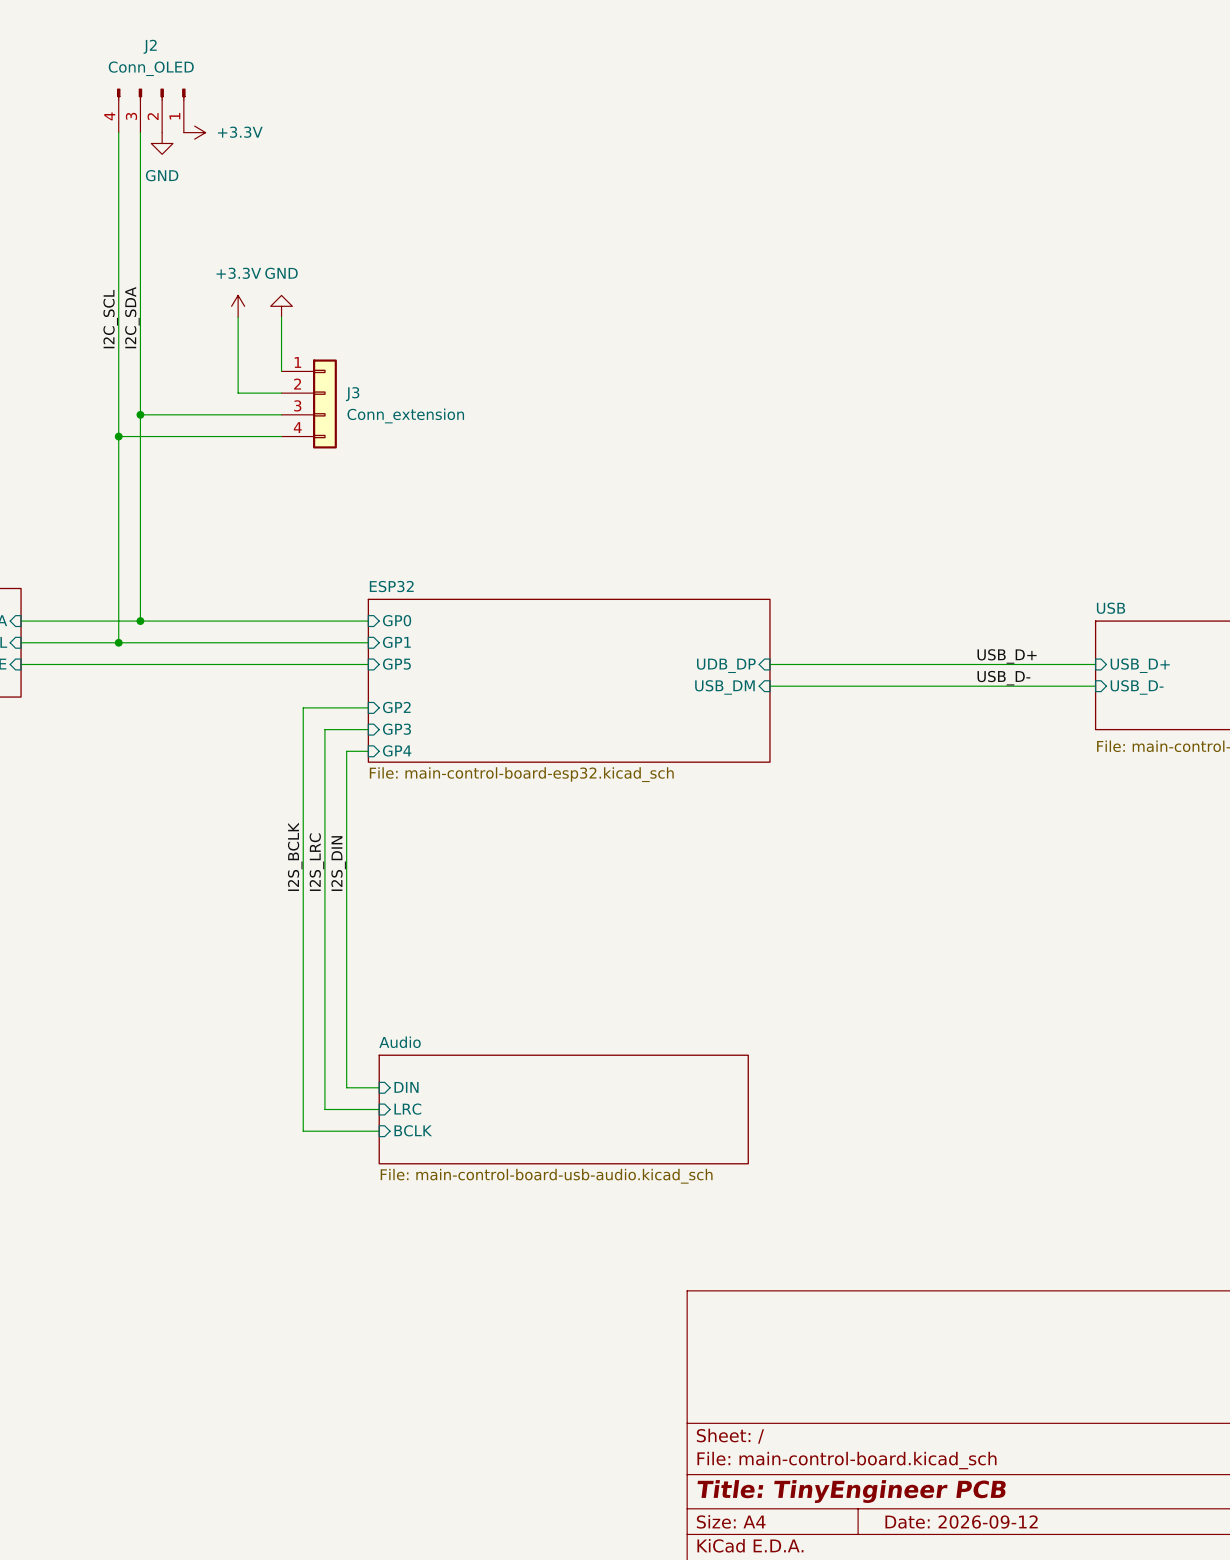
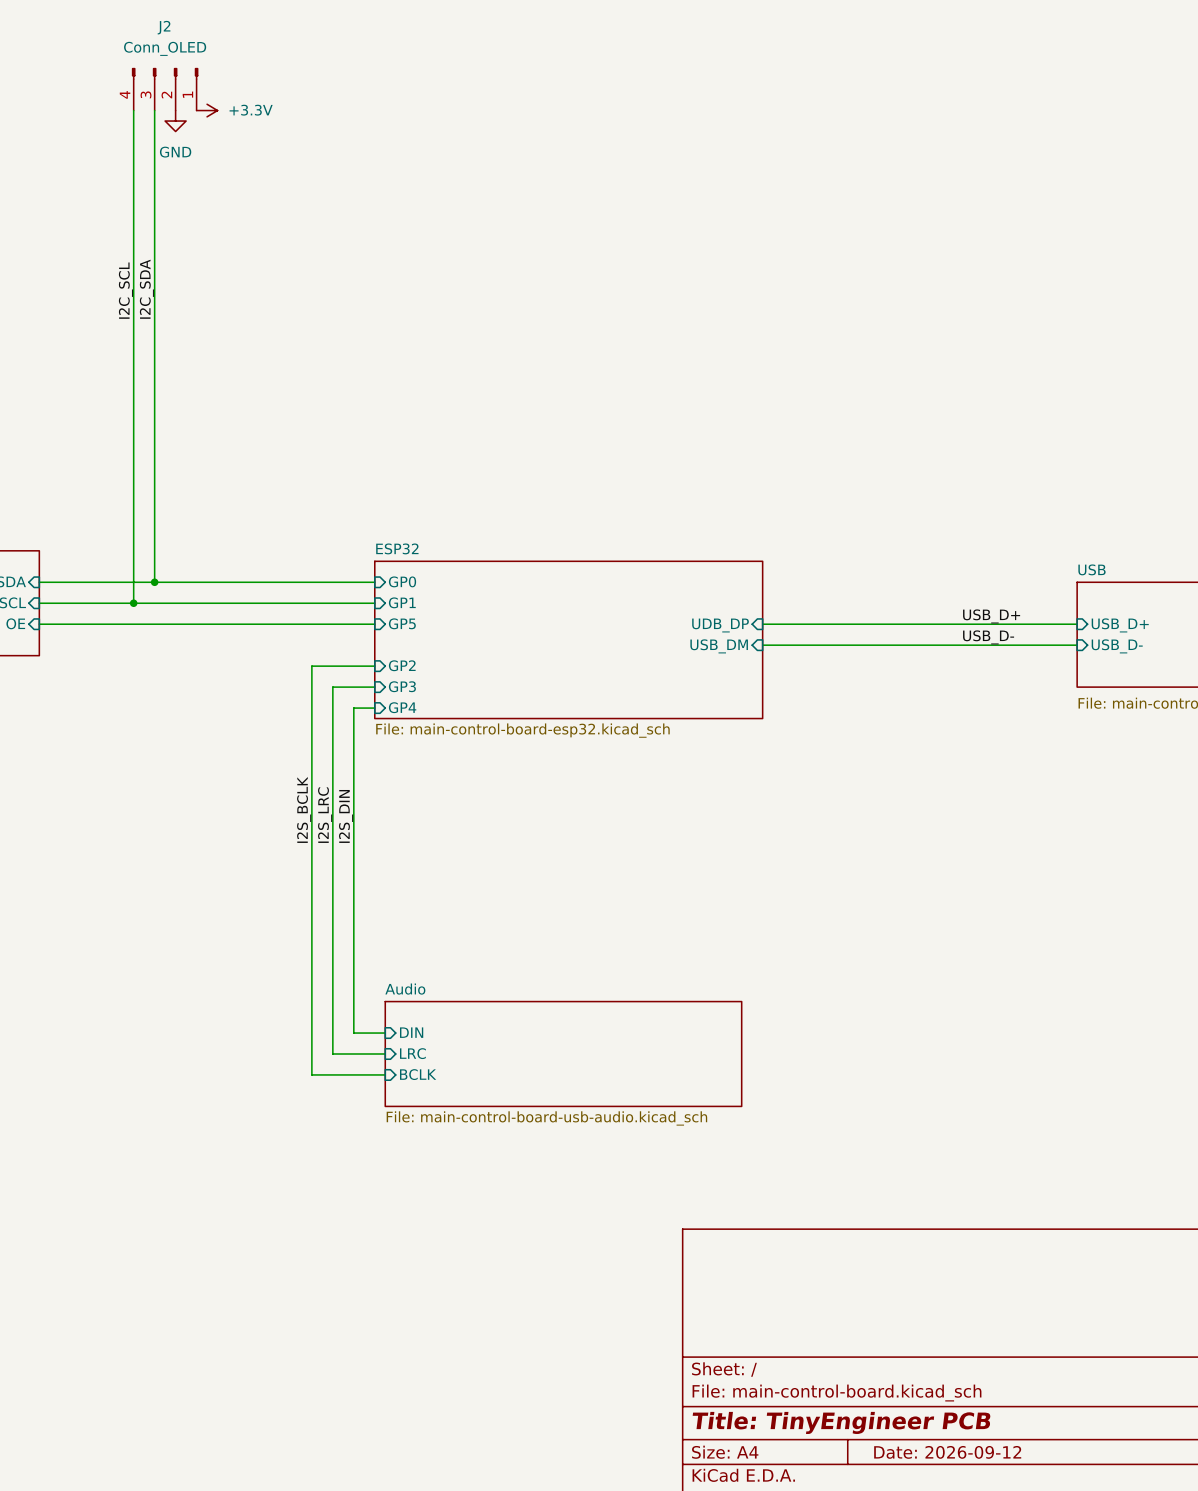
power symbol: +3.3V (238, 306) -> none
power symbol: GND (281, 306) -> none
wire: (238, 317) (238, 393) (281, 393) -> none
wire: (281, 317) (281, 371) -> none
J3: Conn_extension (309, 403) -> none
wire: (140, 414) (281, 414) -> none
junction: (140, 414) -> none
wire: (118, 436) (281, 436) -> none
junction: (118, 436) -> none

